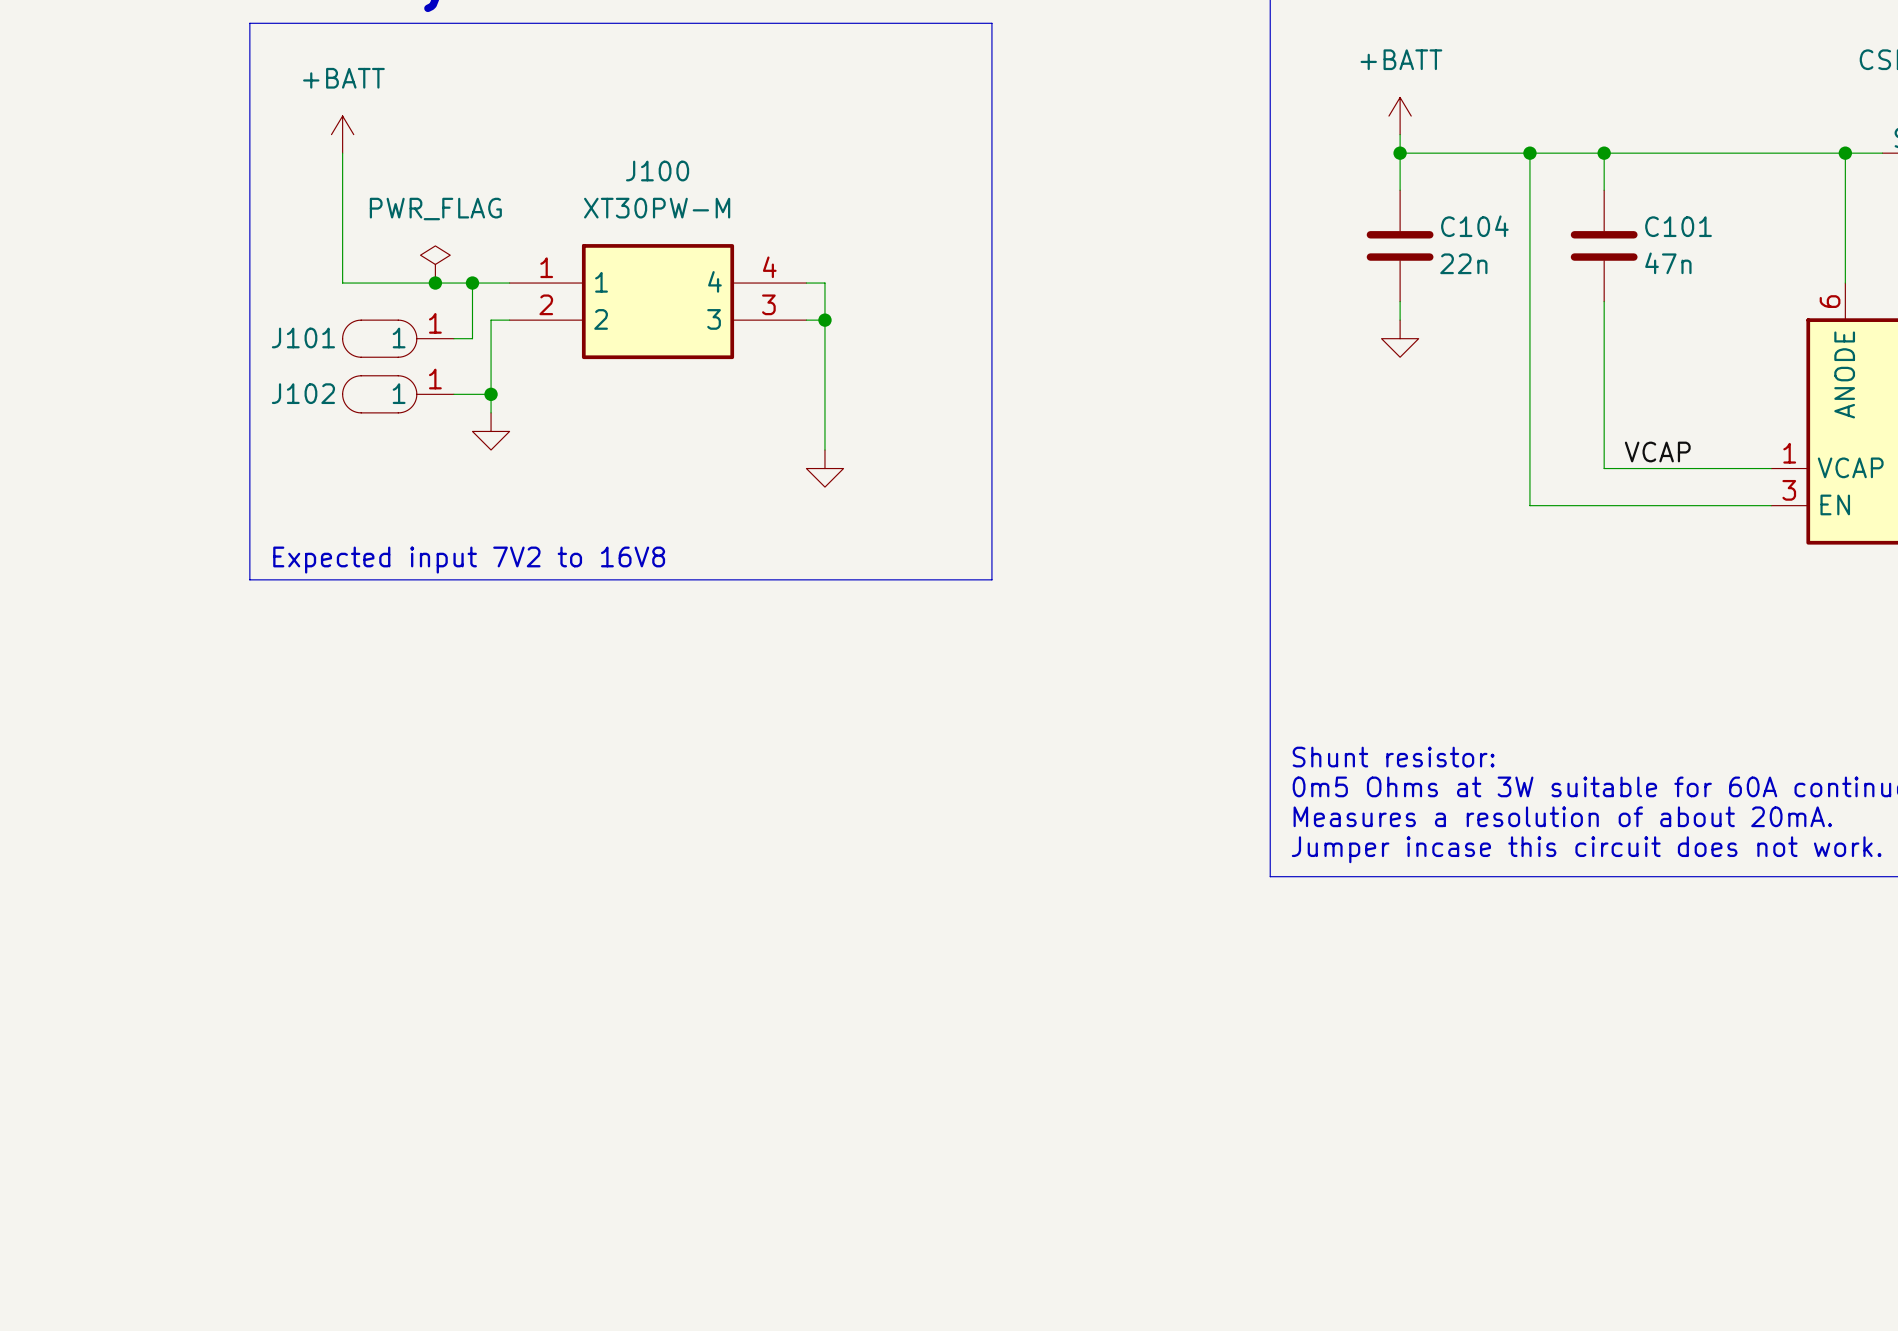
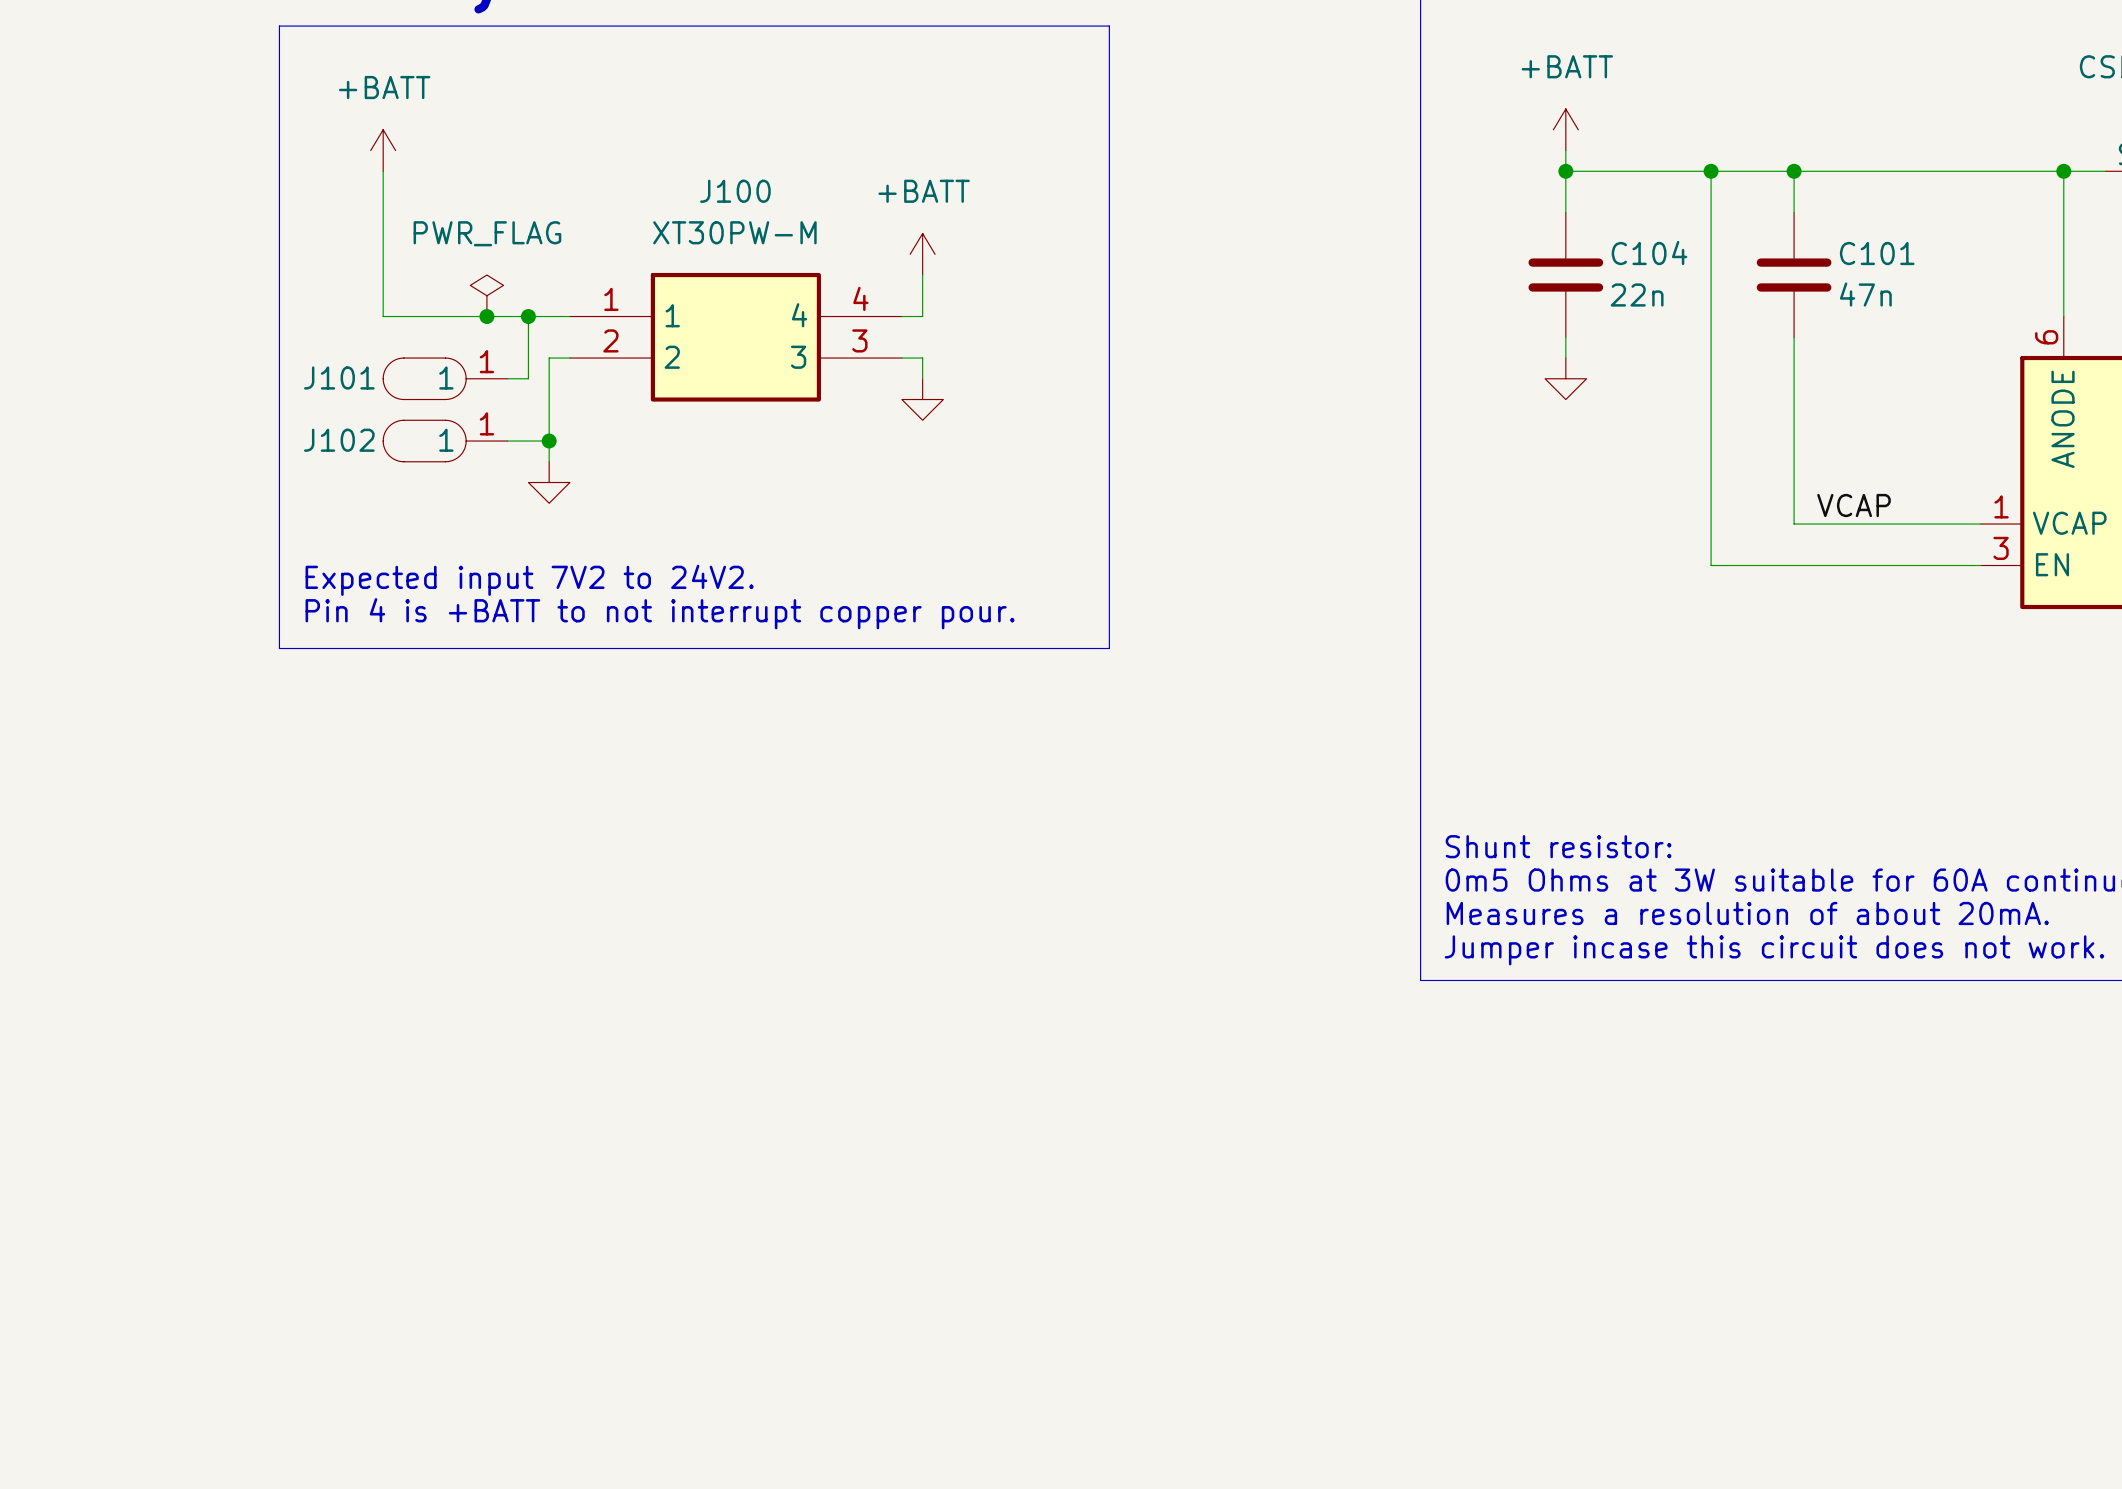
power symbol: none -> +BATT (922, 254)
wire: (824, 283) (824, 320) -> (922, 316) (922, 275)
junction: (824, 320) -> none
wire: (824, 338) (824, 449) -> none
power symbol position: (824, 468) -> (922, 399)
text: none -> Expected input 7V2 to 24V2. (529, 580)
text: Expected input 7V2 to 16V8 (469, 560) -> Pin 4 is +BATT to not interrupt copper pour. (660, 613)

